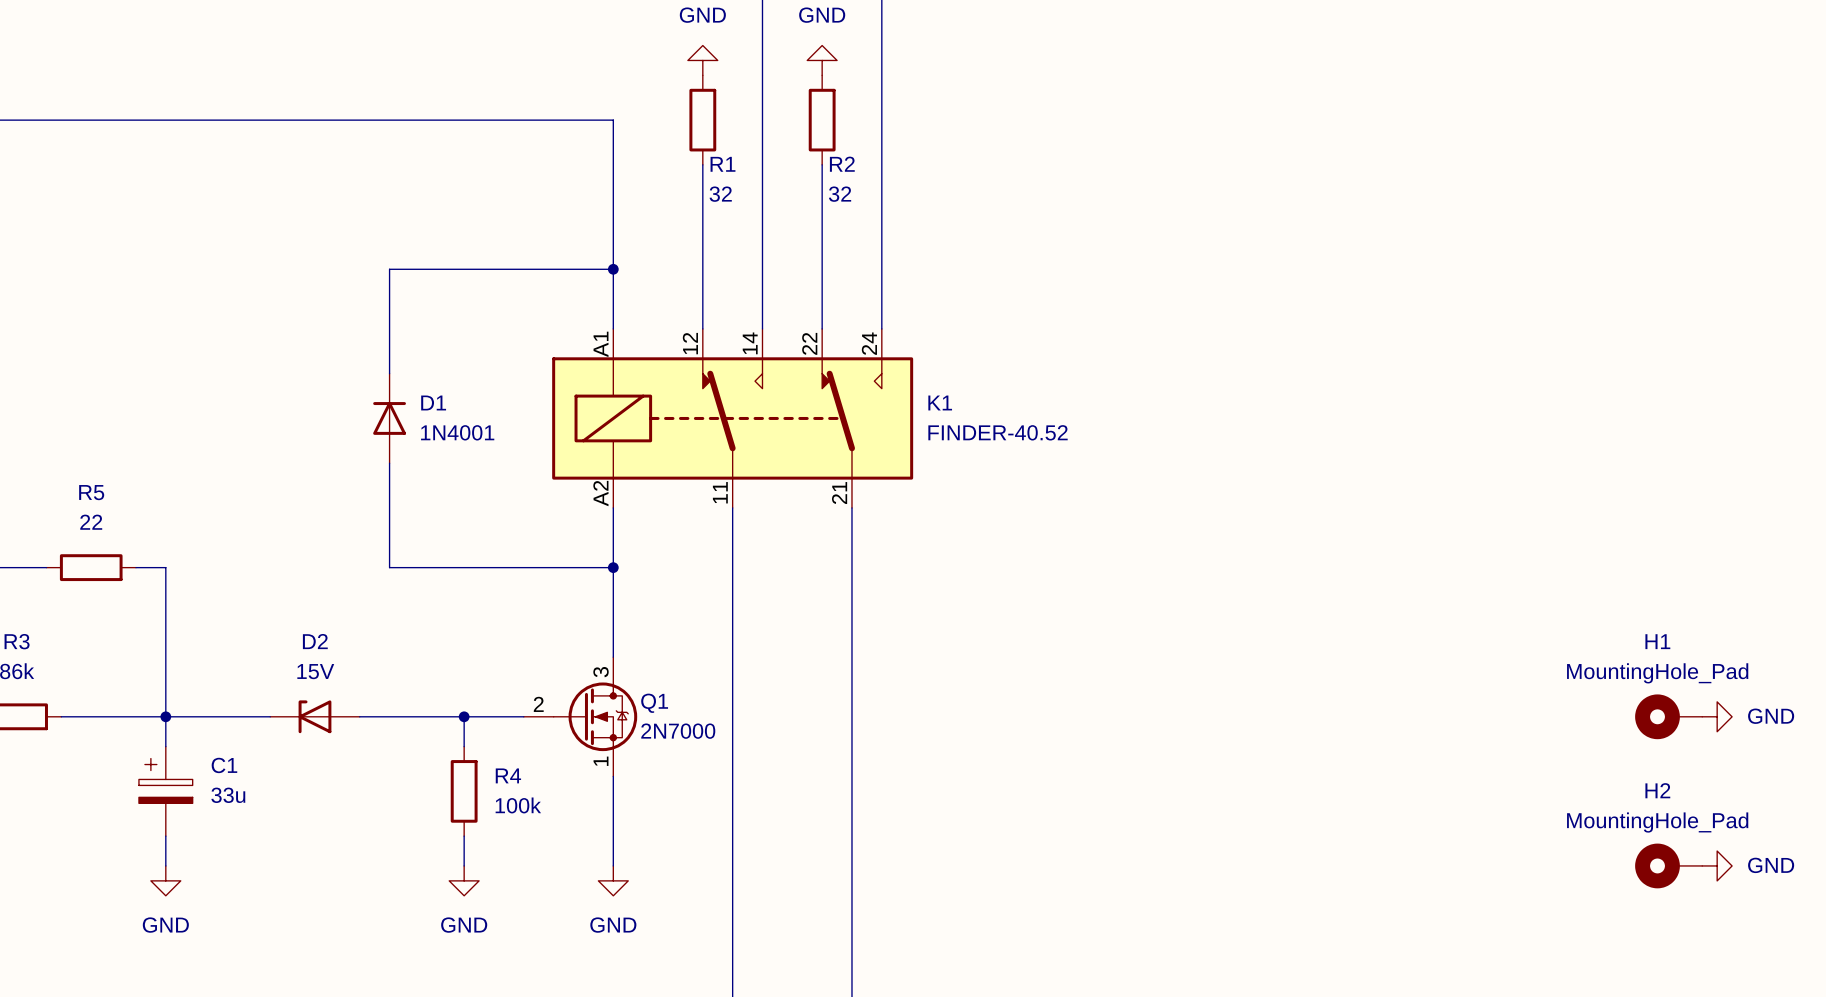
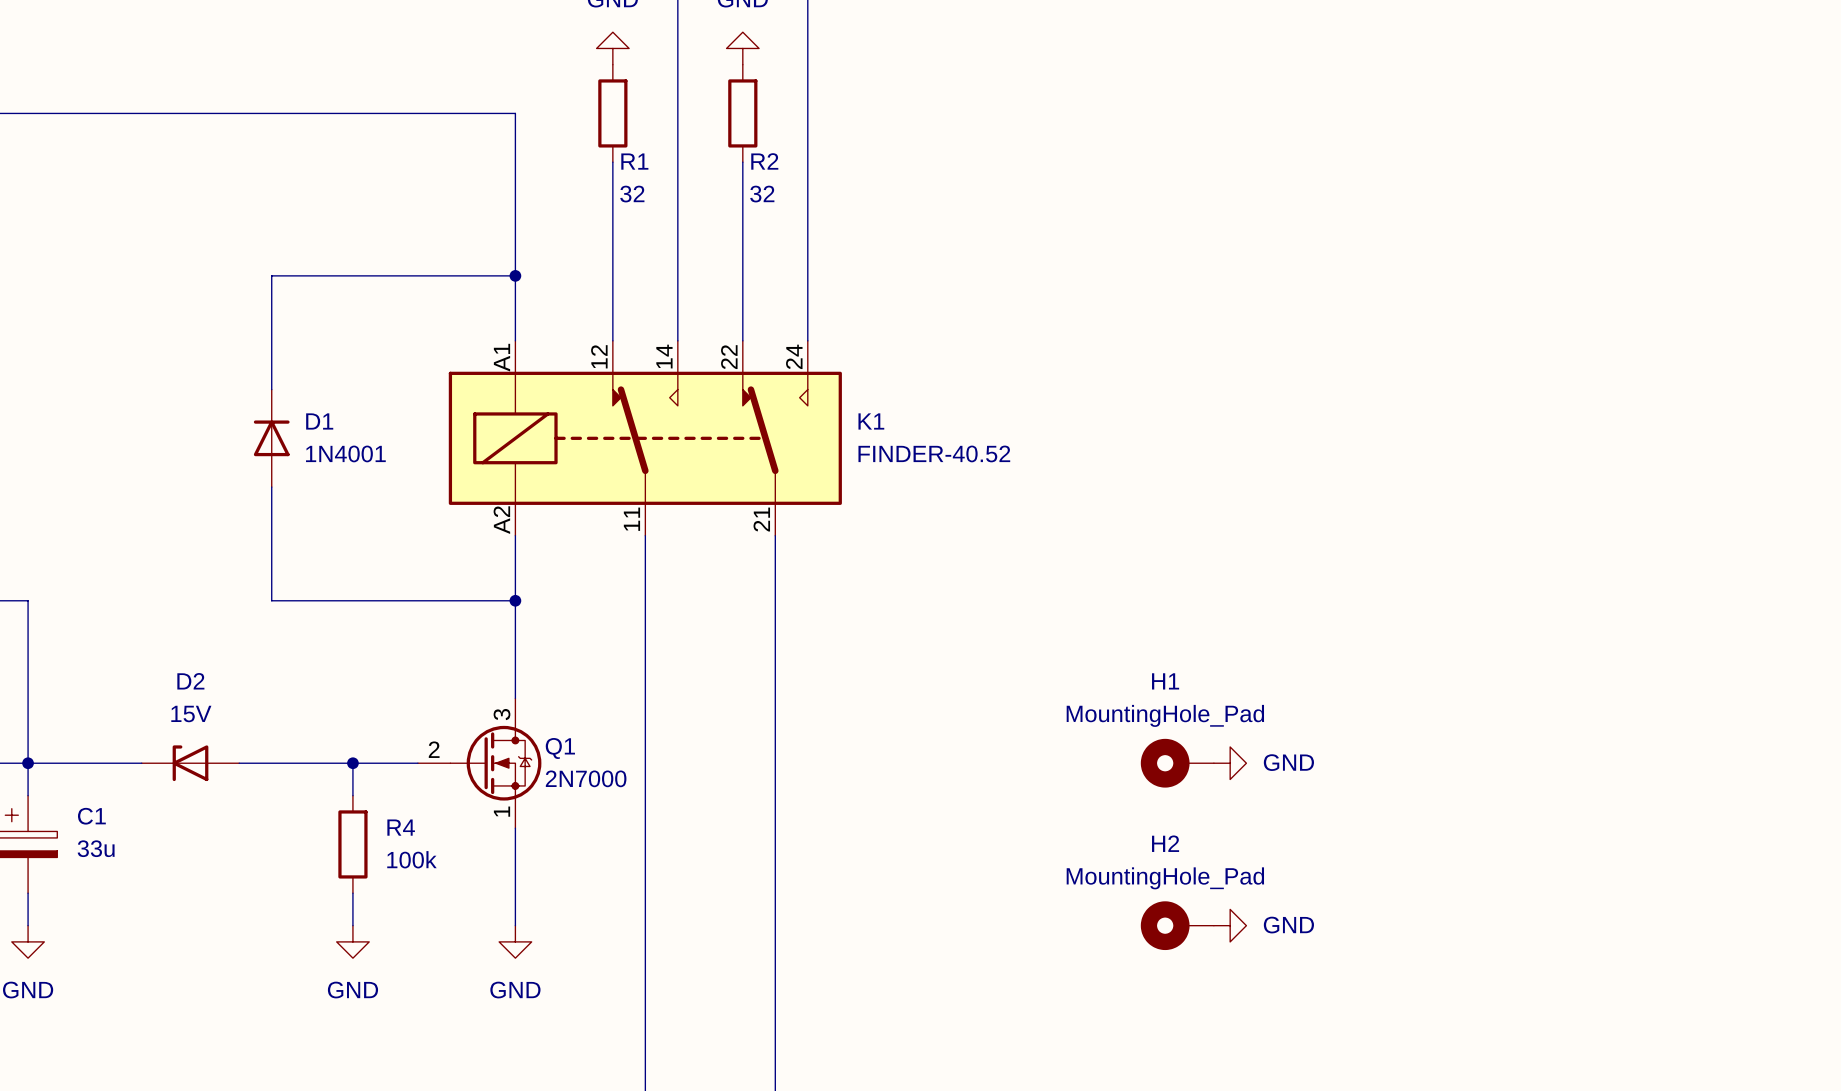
power symbol: none -> GND (1230, 763)
H1 position: (1668, 716) -> (1177, 763)
power symbol: GND (1717, 716) -> none
power symbol: none -> GND (1230, 925)
H2 position: (1668, 865) -> (1177, 925)
power symbol: GND (1717, 865) -> none

